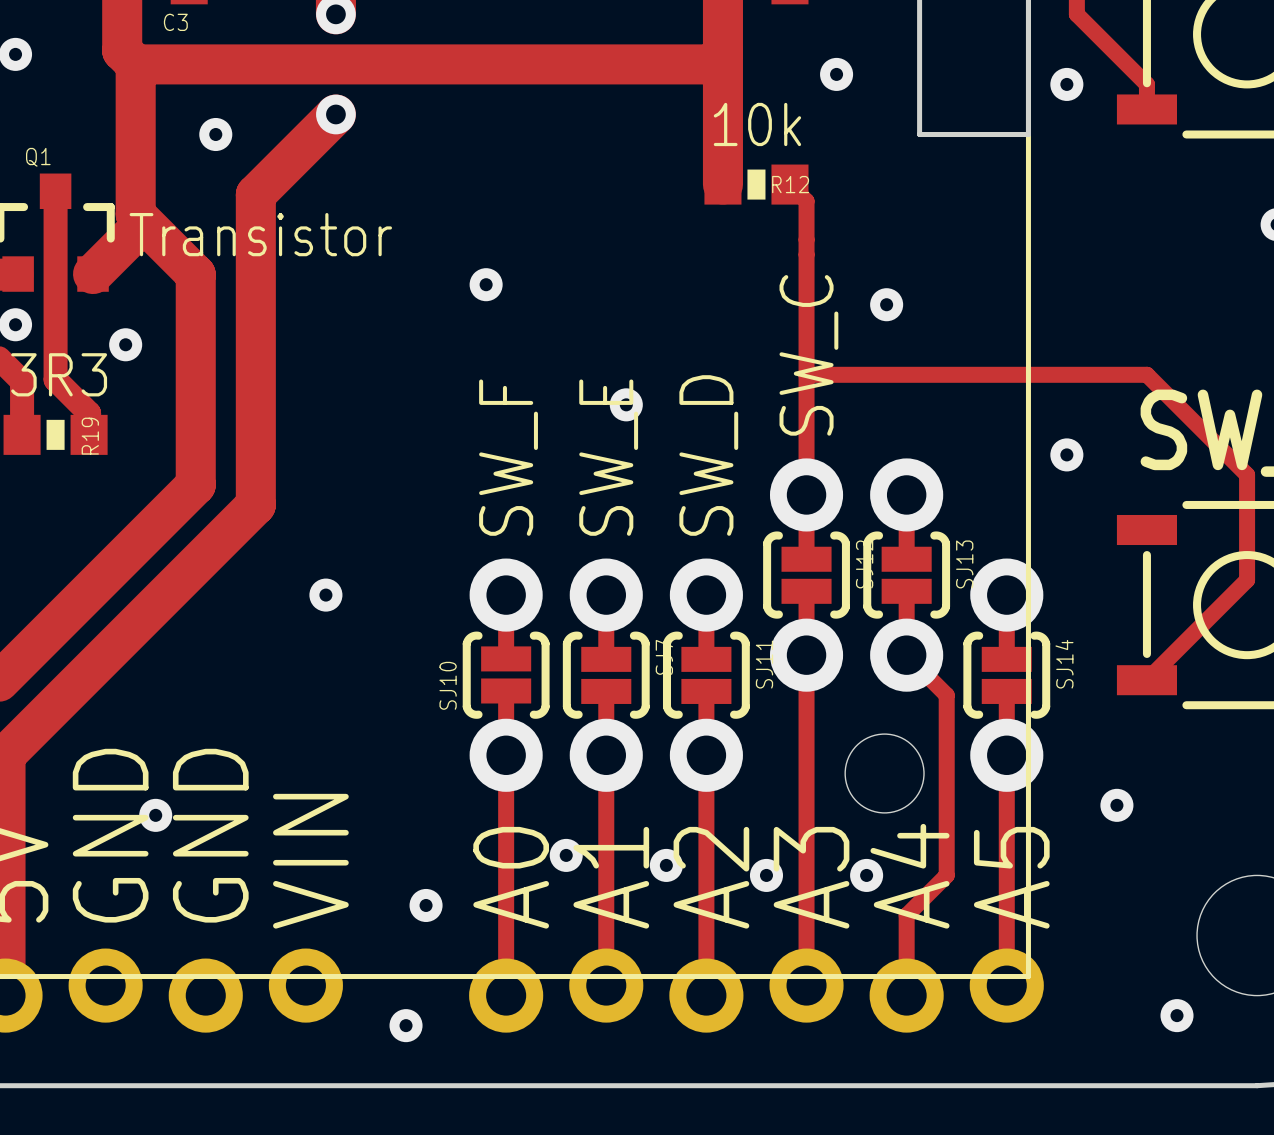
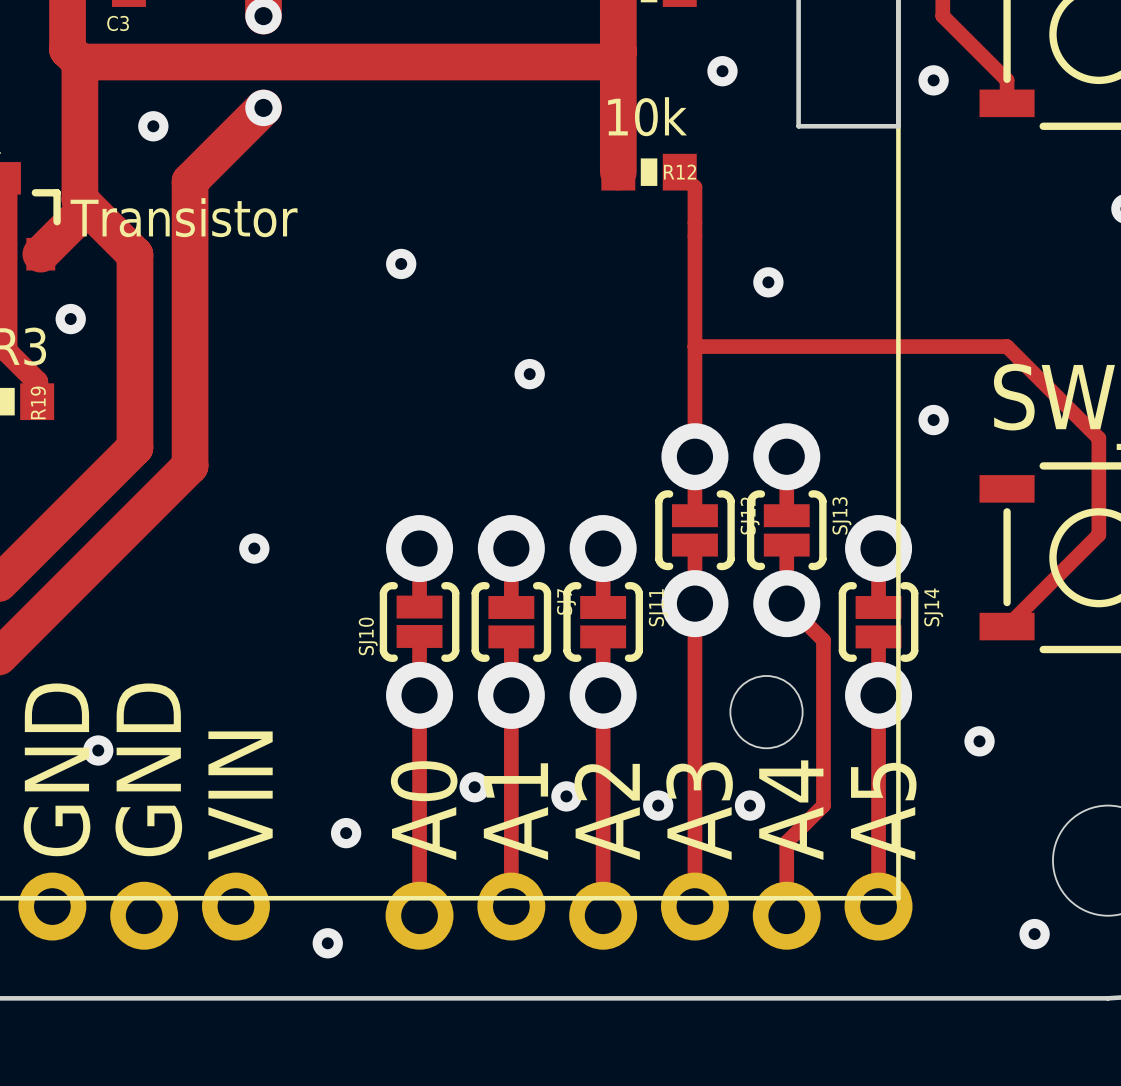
text: SW_C (808, 355) -> none
text: SW_D (708, 455) -> none
text: SW_F (508, 457) -> none
text: SW_E (608, 457) -> none

